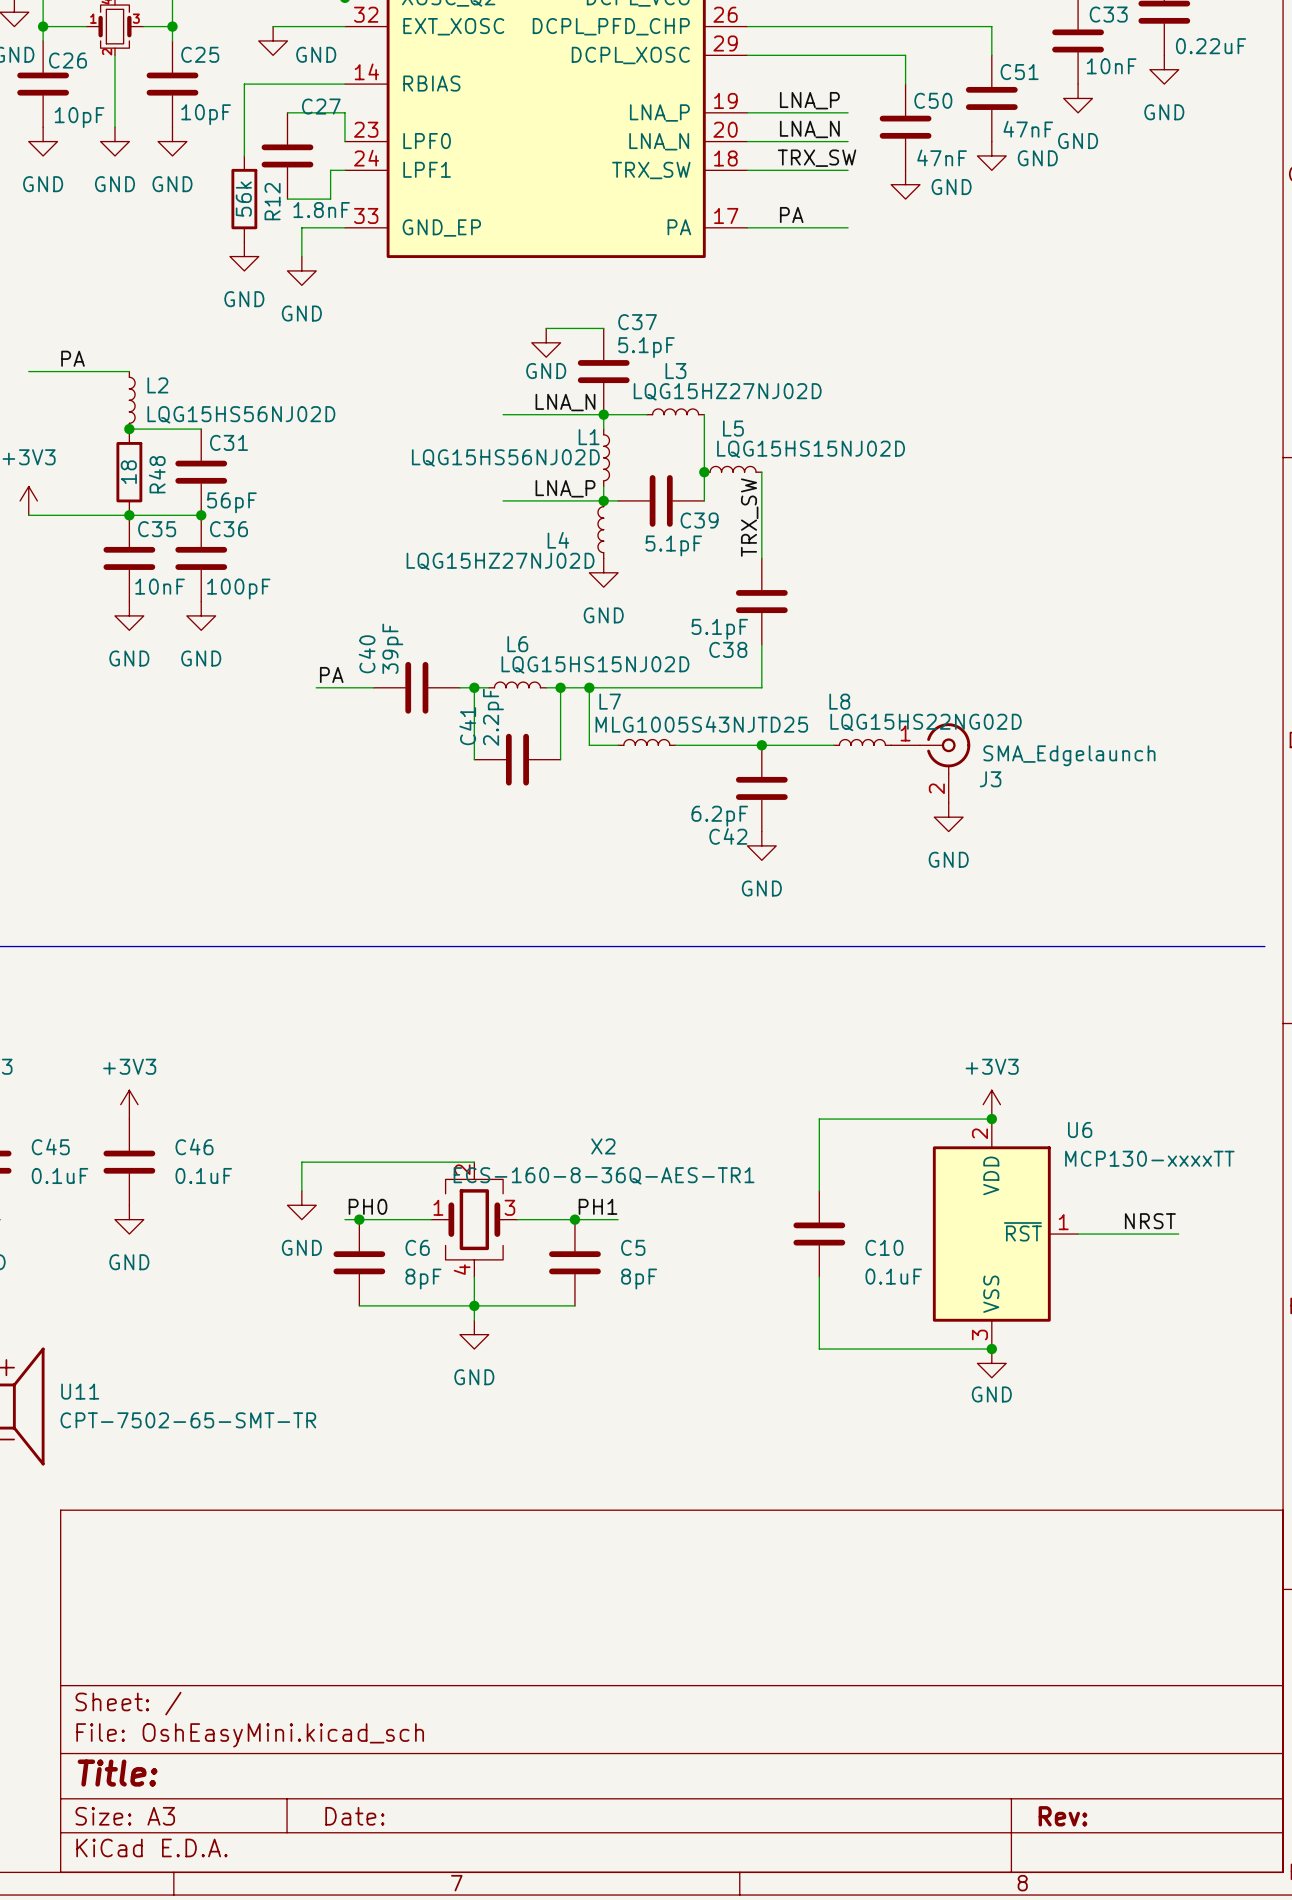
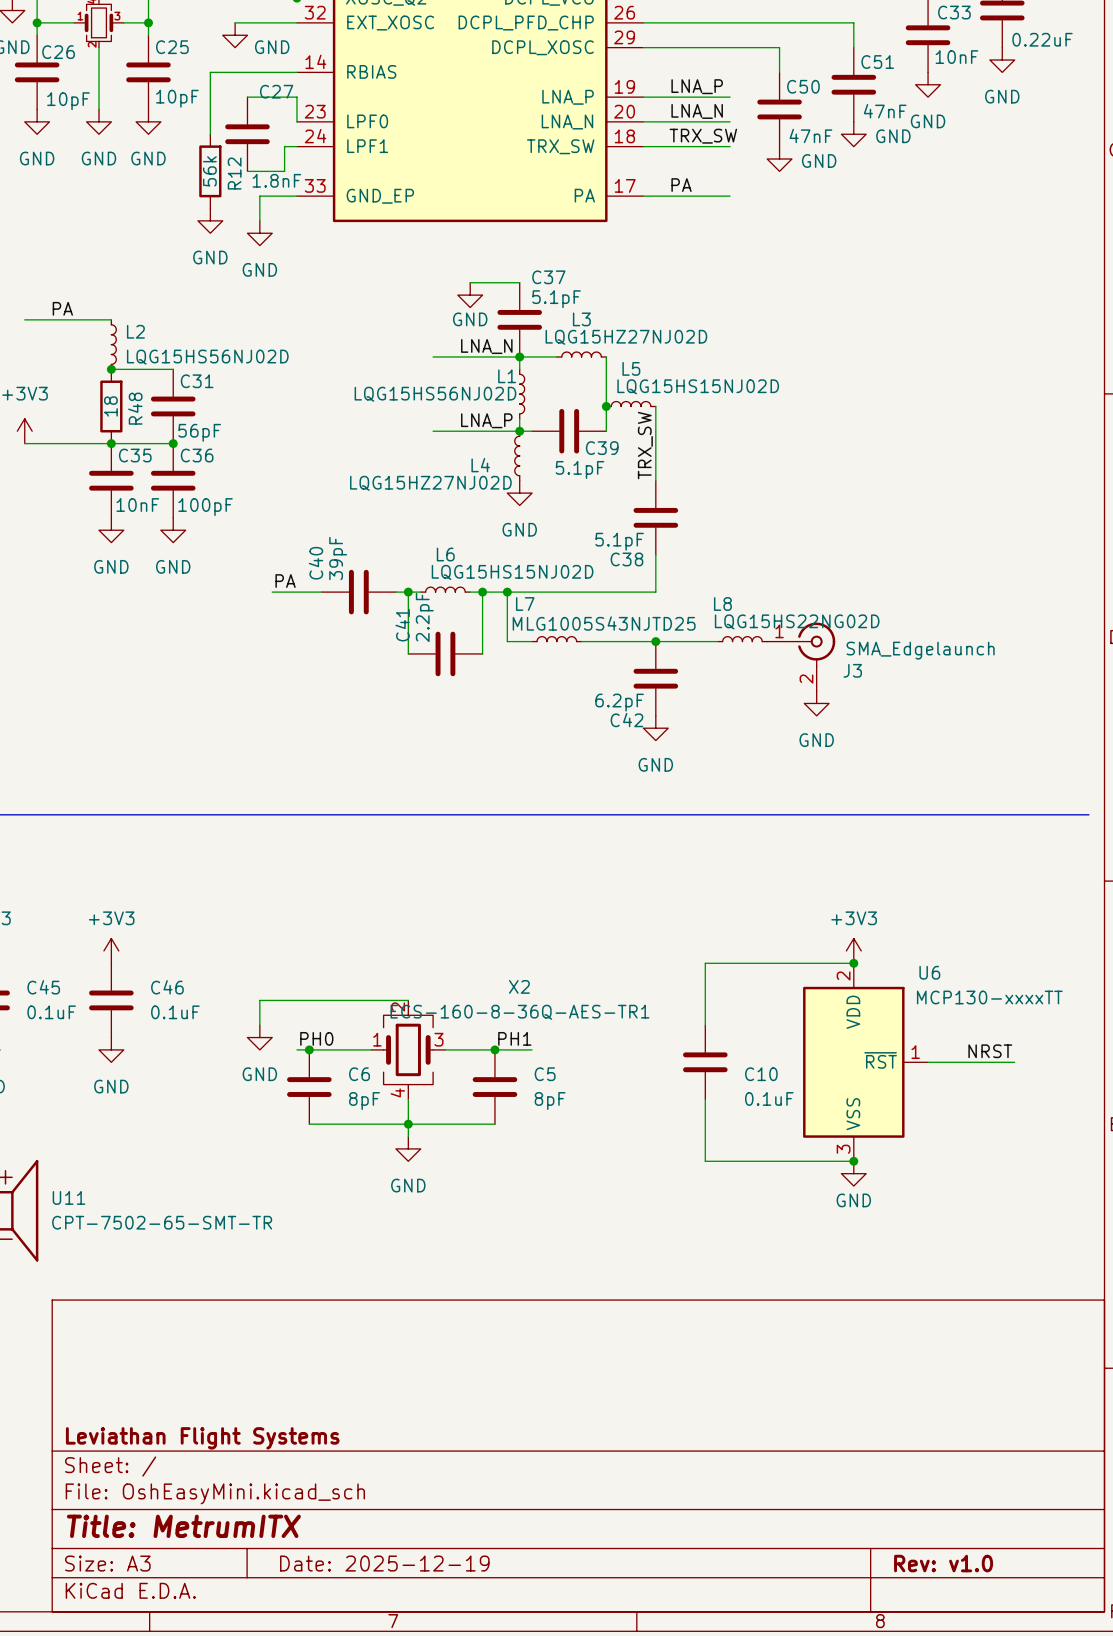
title block: none -> Leviathan Flight Systems (202, 1438)
title block: Title: (117, 1773) -> Title: MetrumITX (183, 1526)
title block: Date: (354, 1816) -> Date: 2025-12-19 (384, 1563)
title block: Rev: (1062, 1816) -> Rev: v1.0 (943, 1563)

